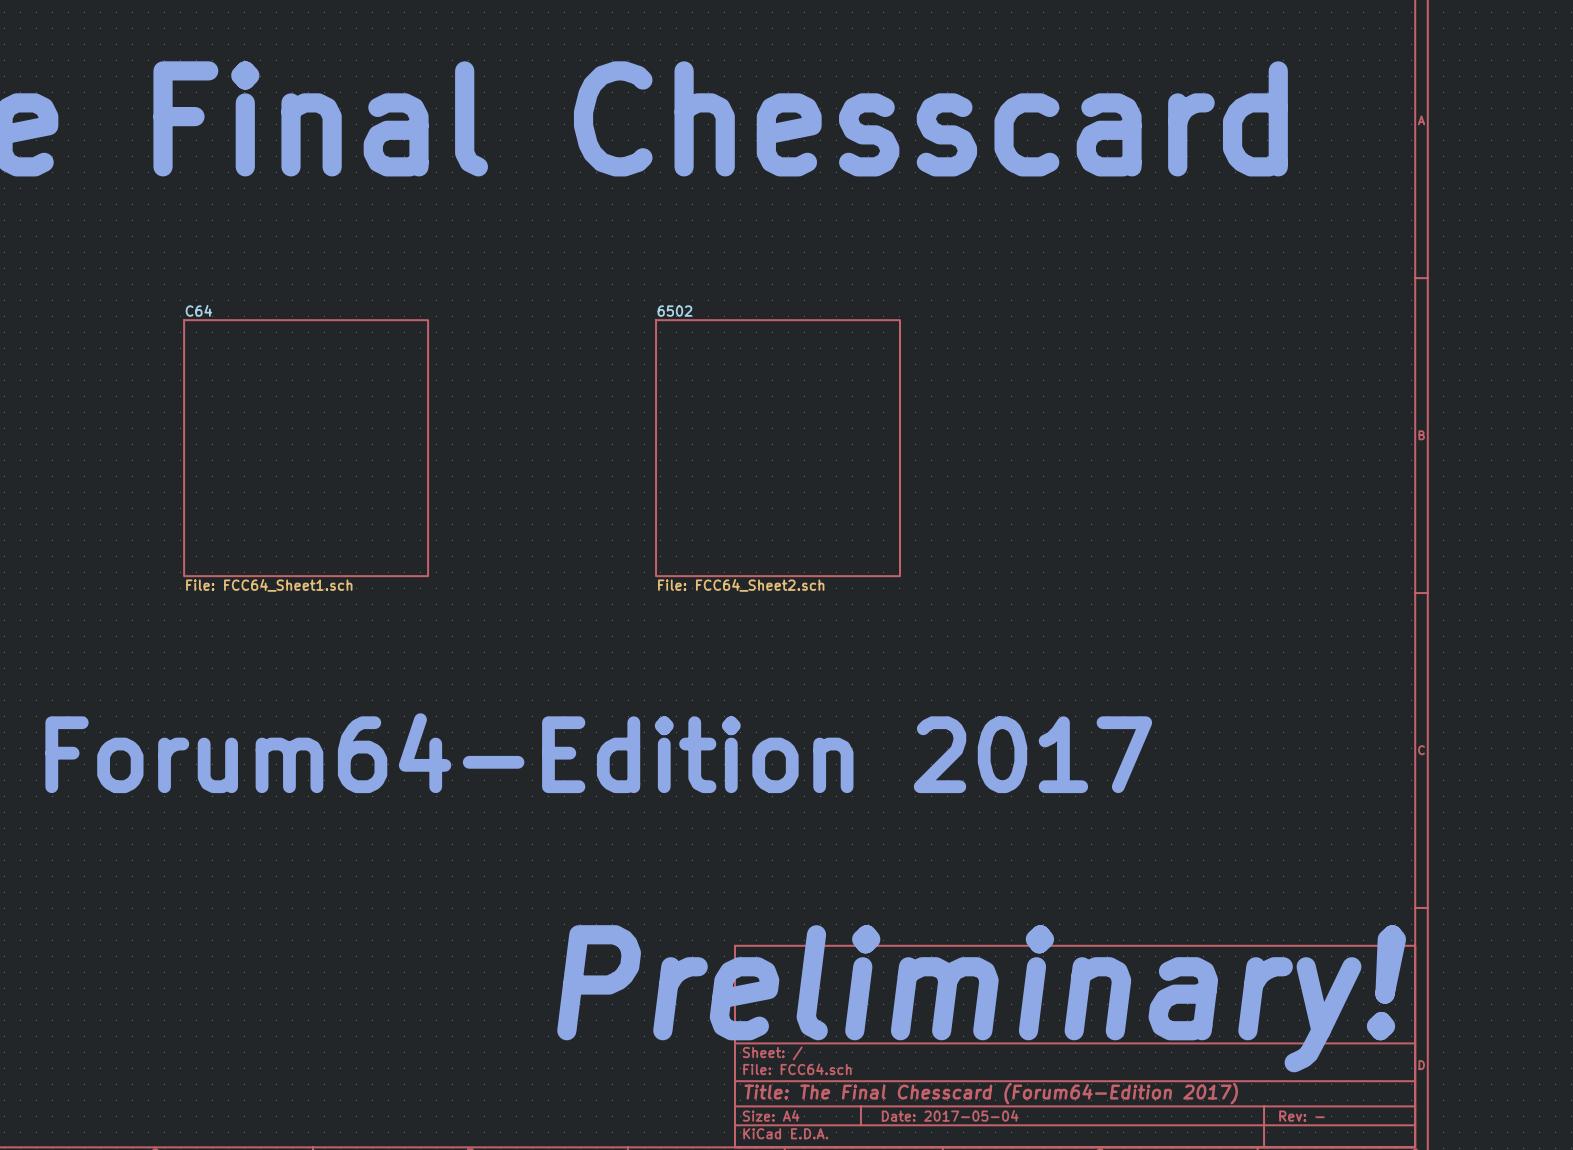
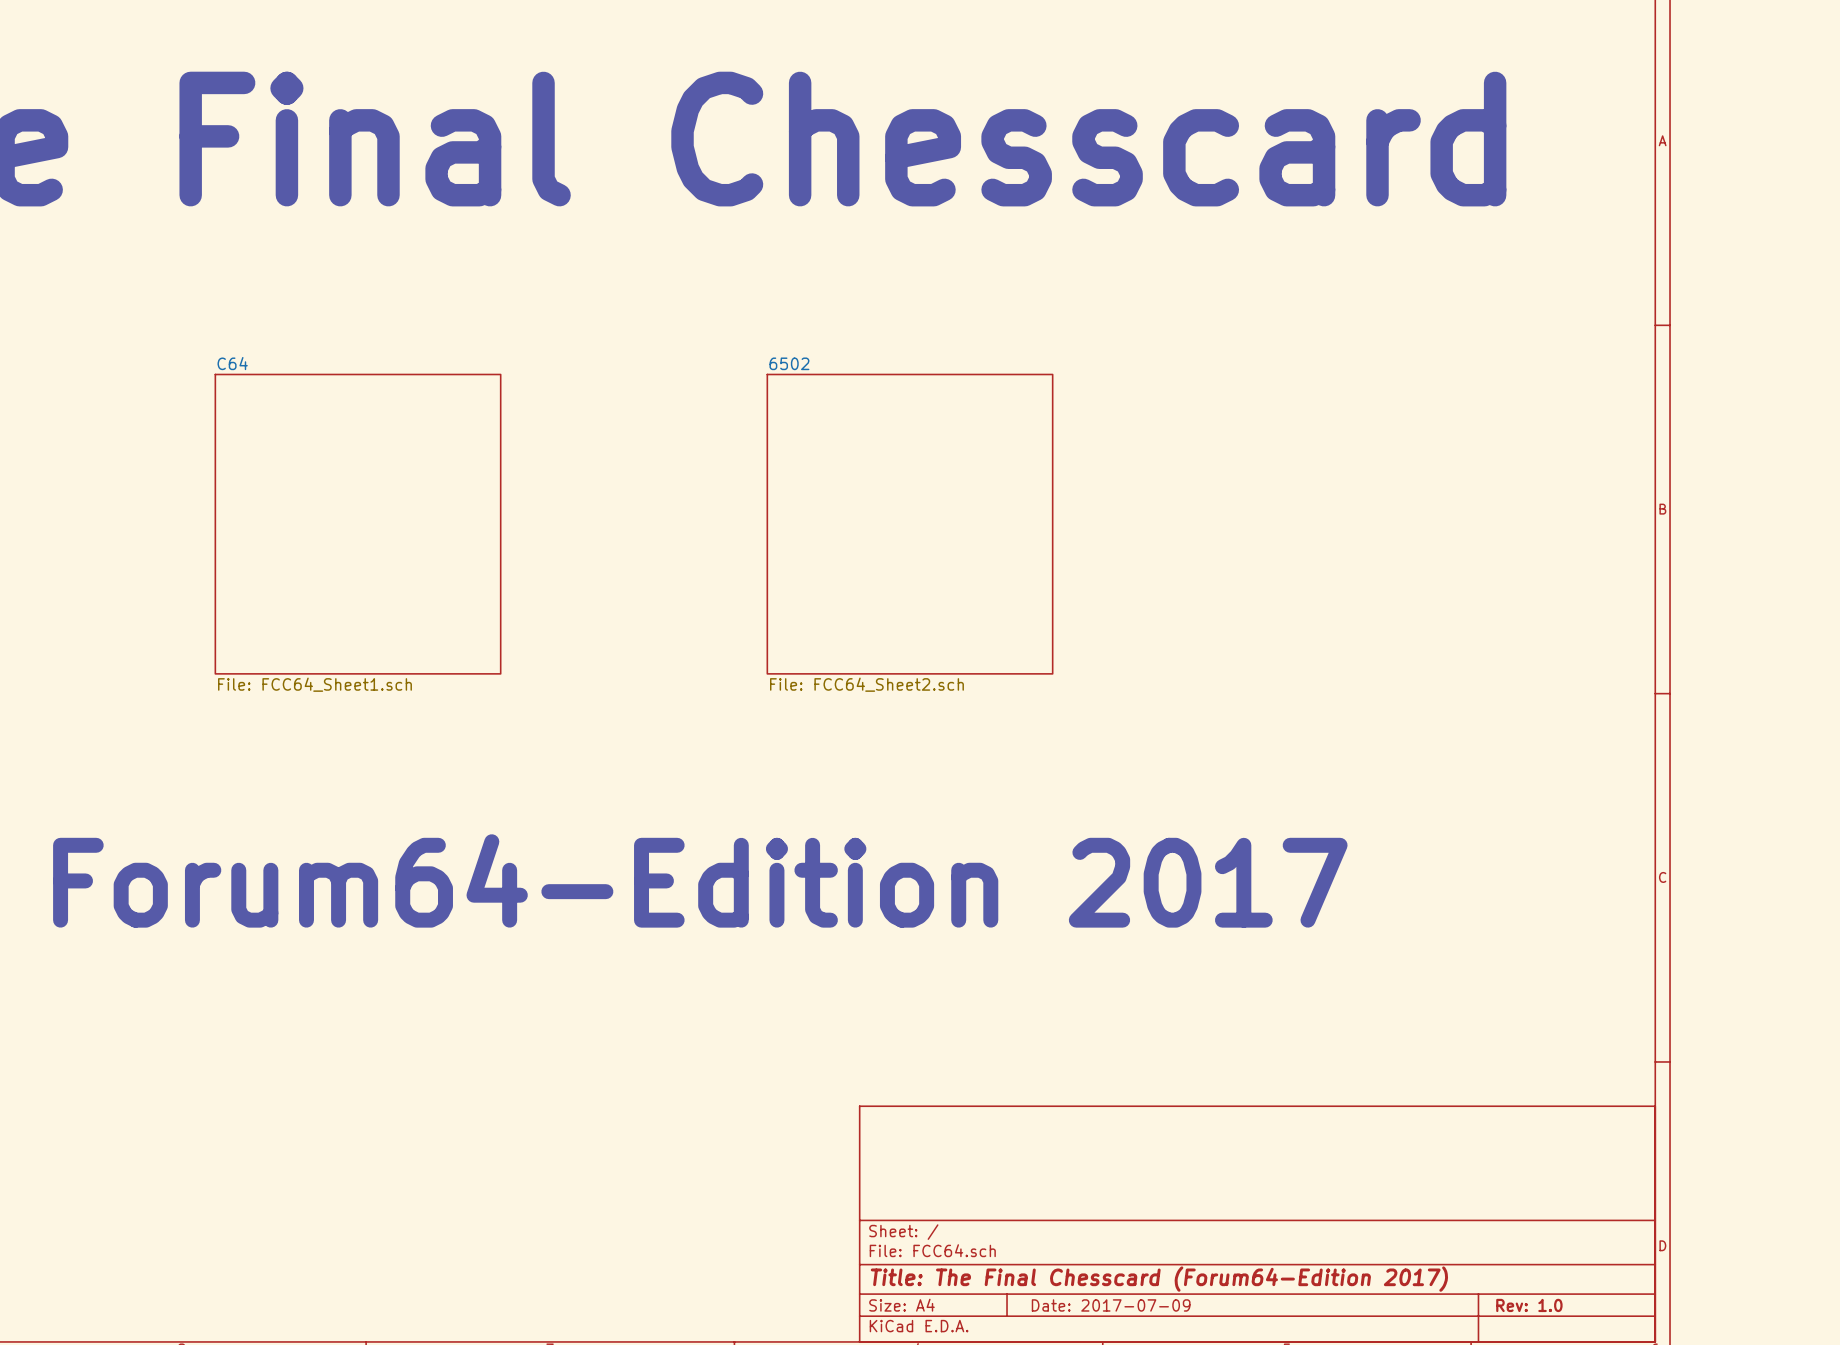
text: Preliminary! (981, 998) -> none
title block: Date: 2017-05-04 (950, 1115) -> Date: 2017-07-09 (1111, 1305)
title block: Rev: - (1301, 1116) -> Rev: 1.0 (1529, 1305)

